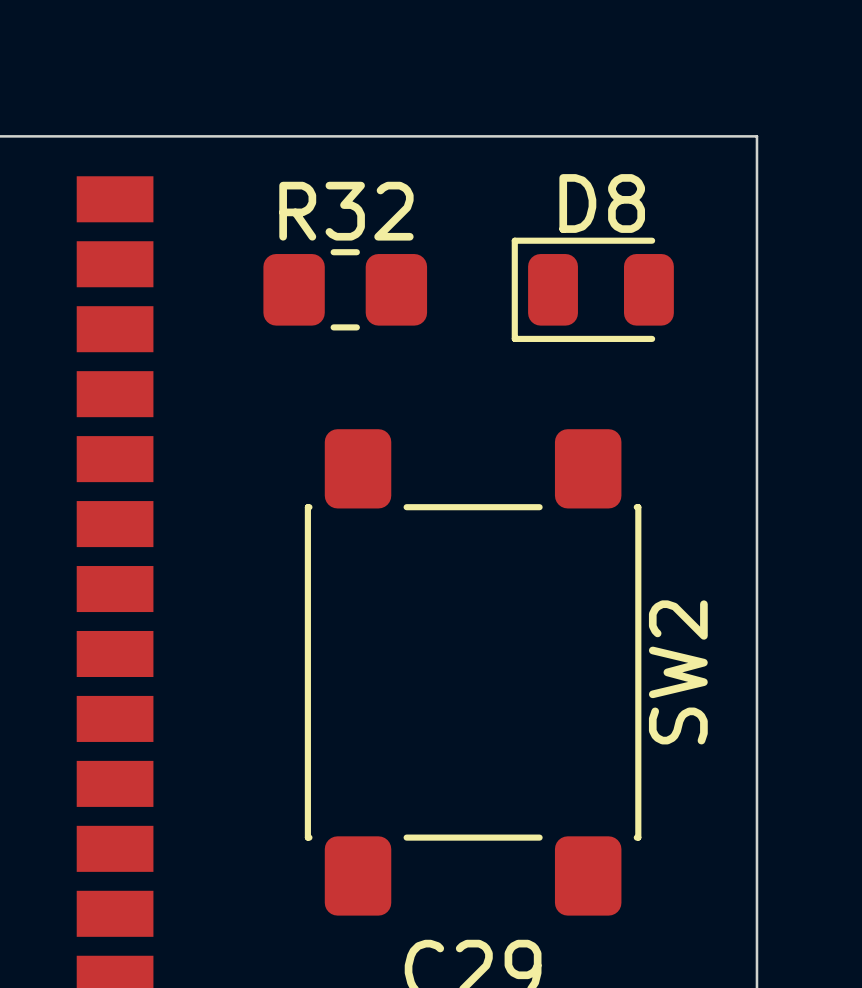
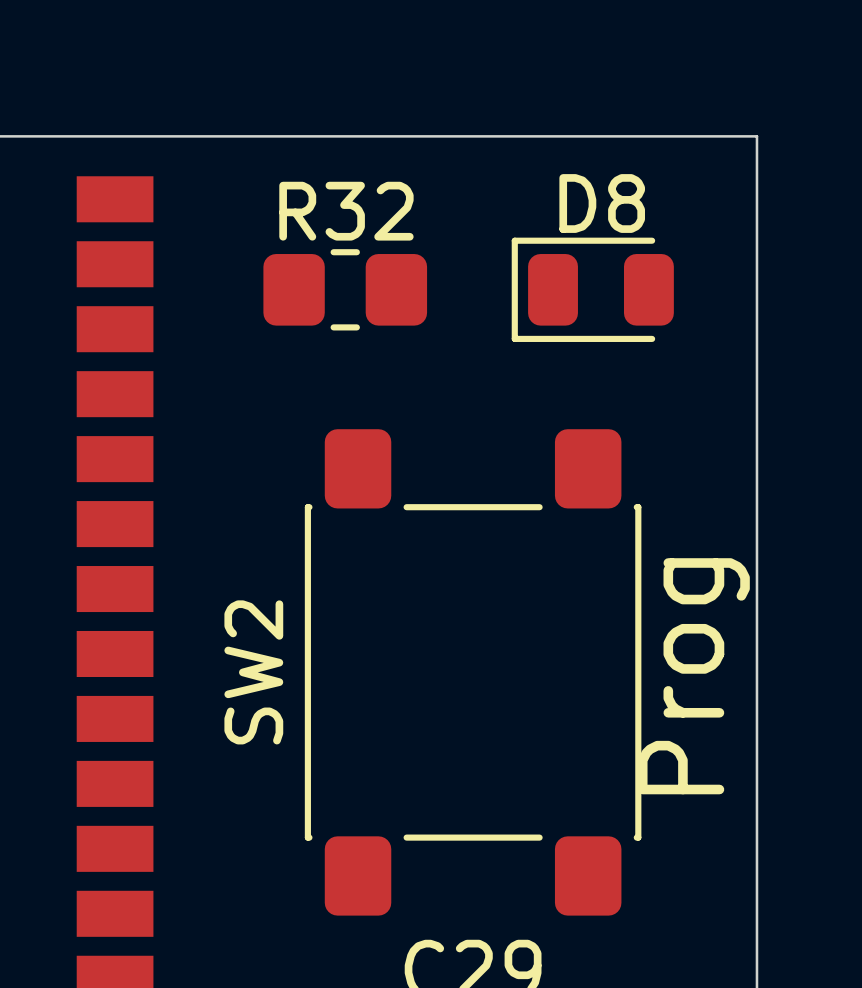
SW2 name position: SW2 (678, 672) -> SW2 (253, 672)
text: none -> Prog (693, 676)

